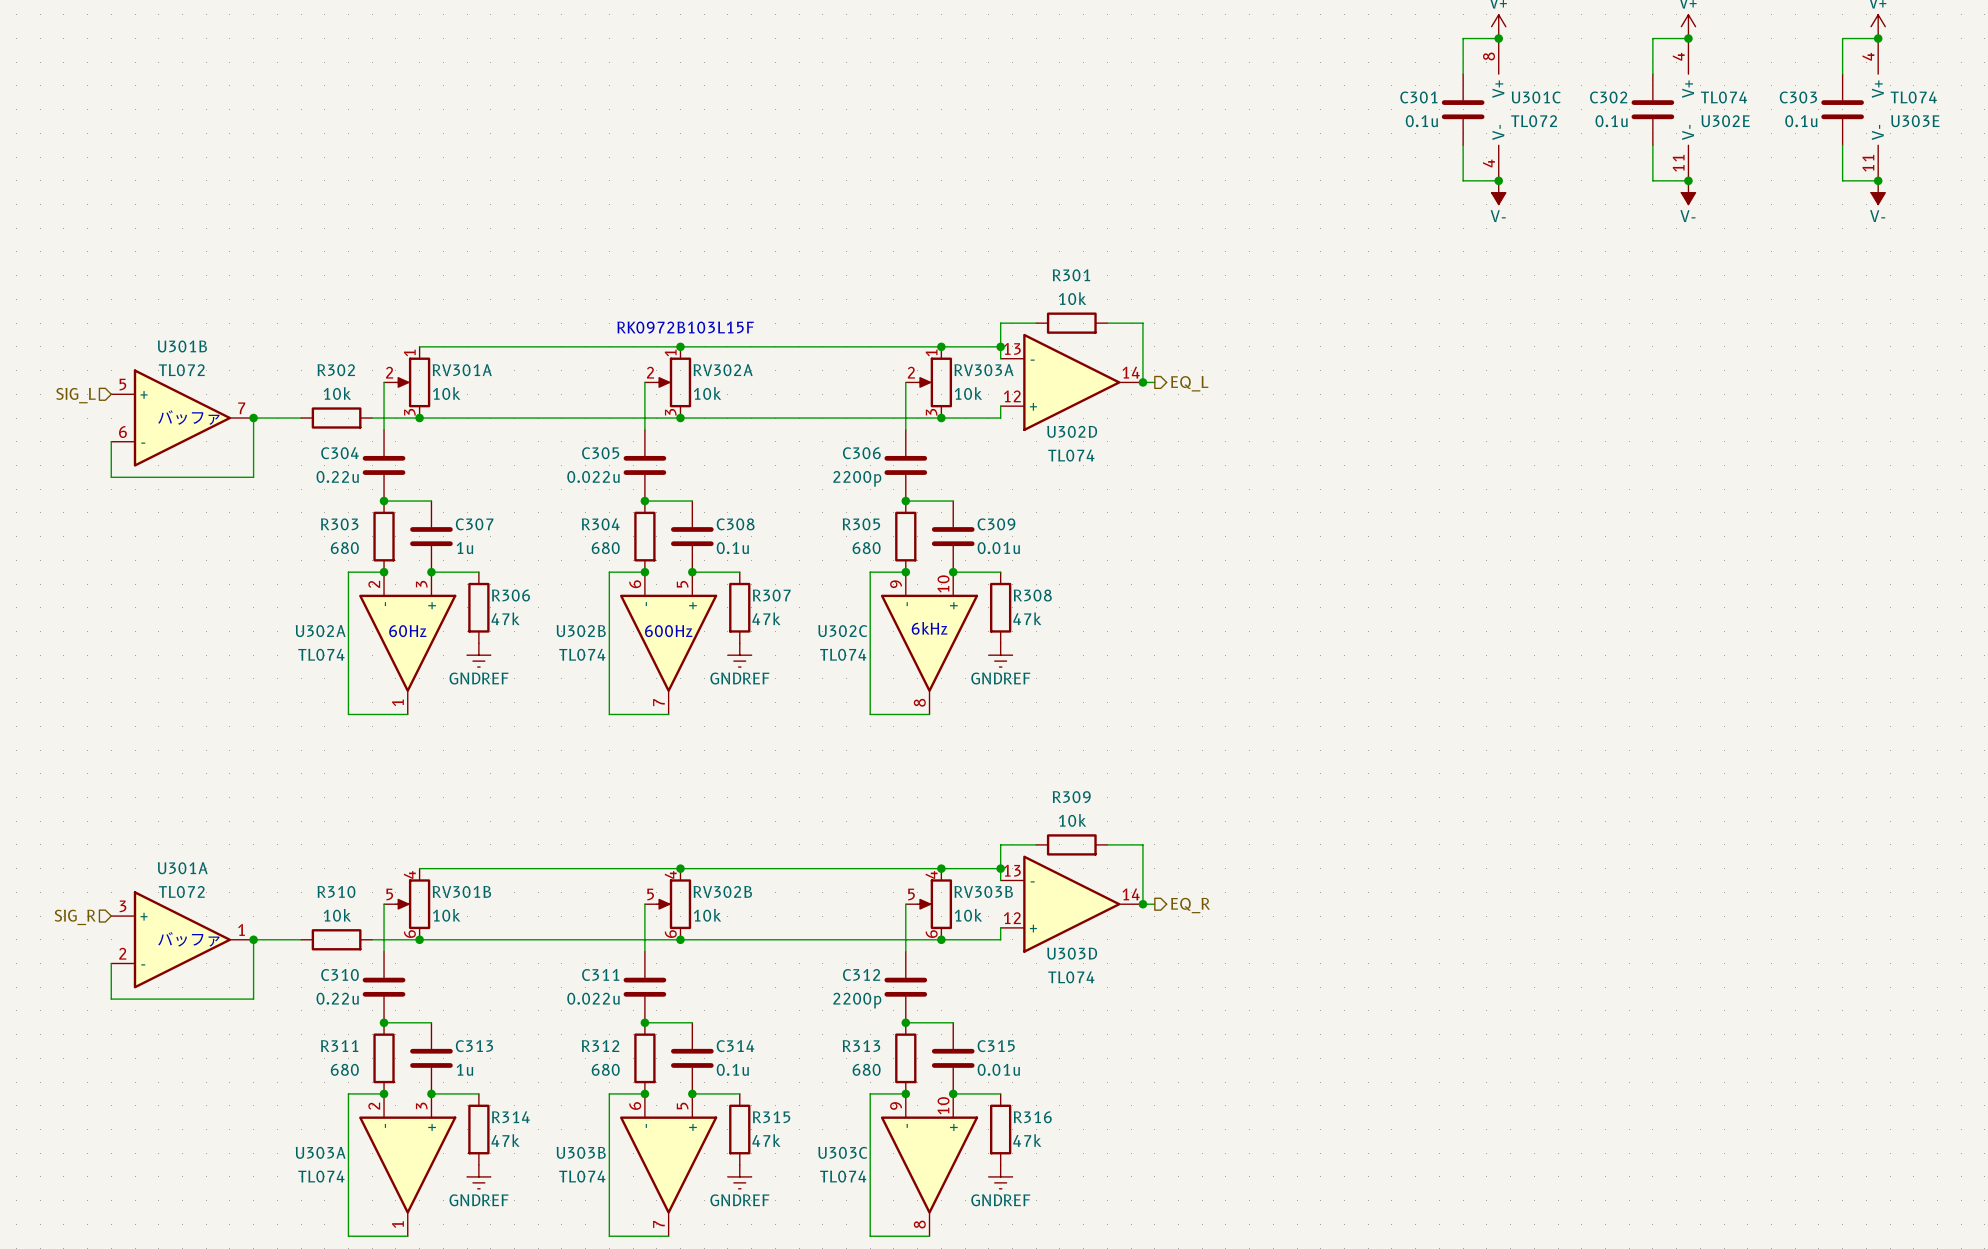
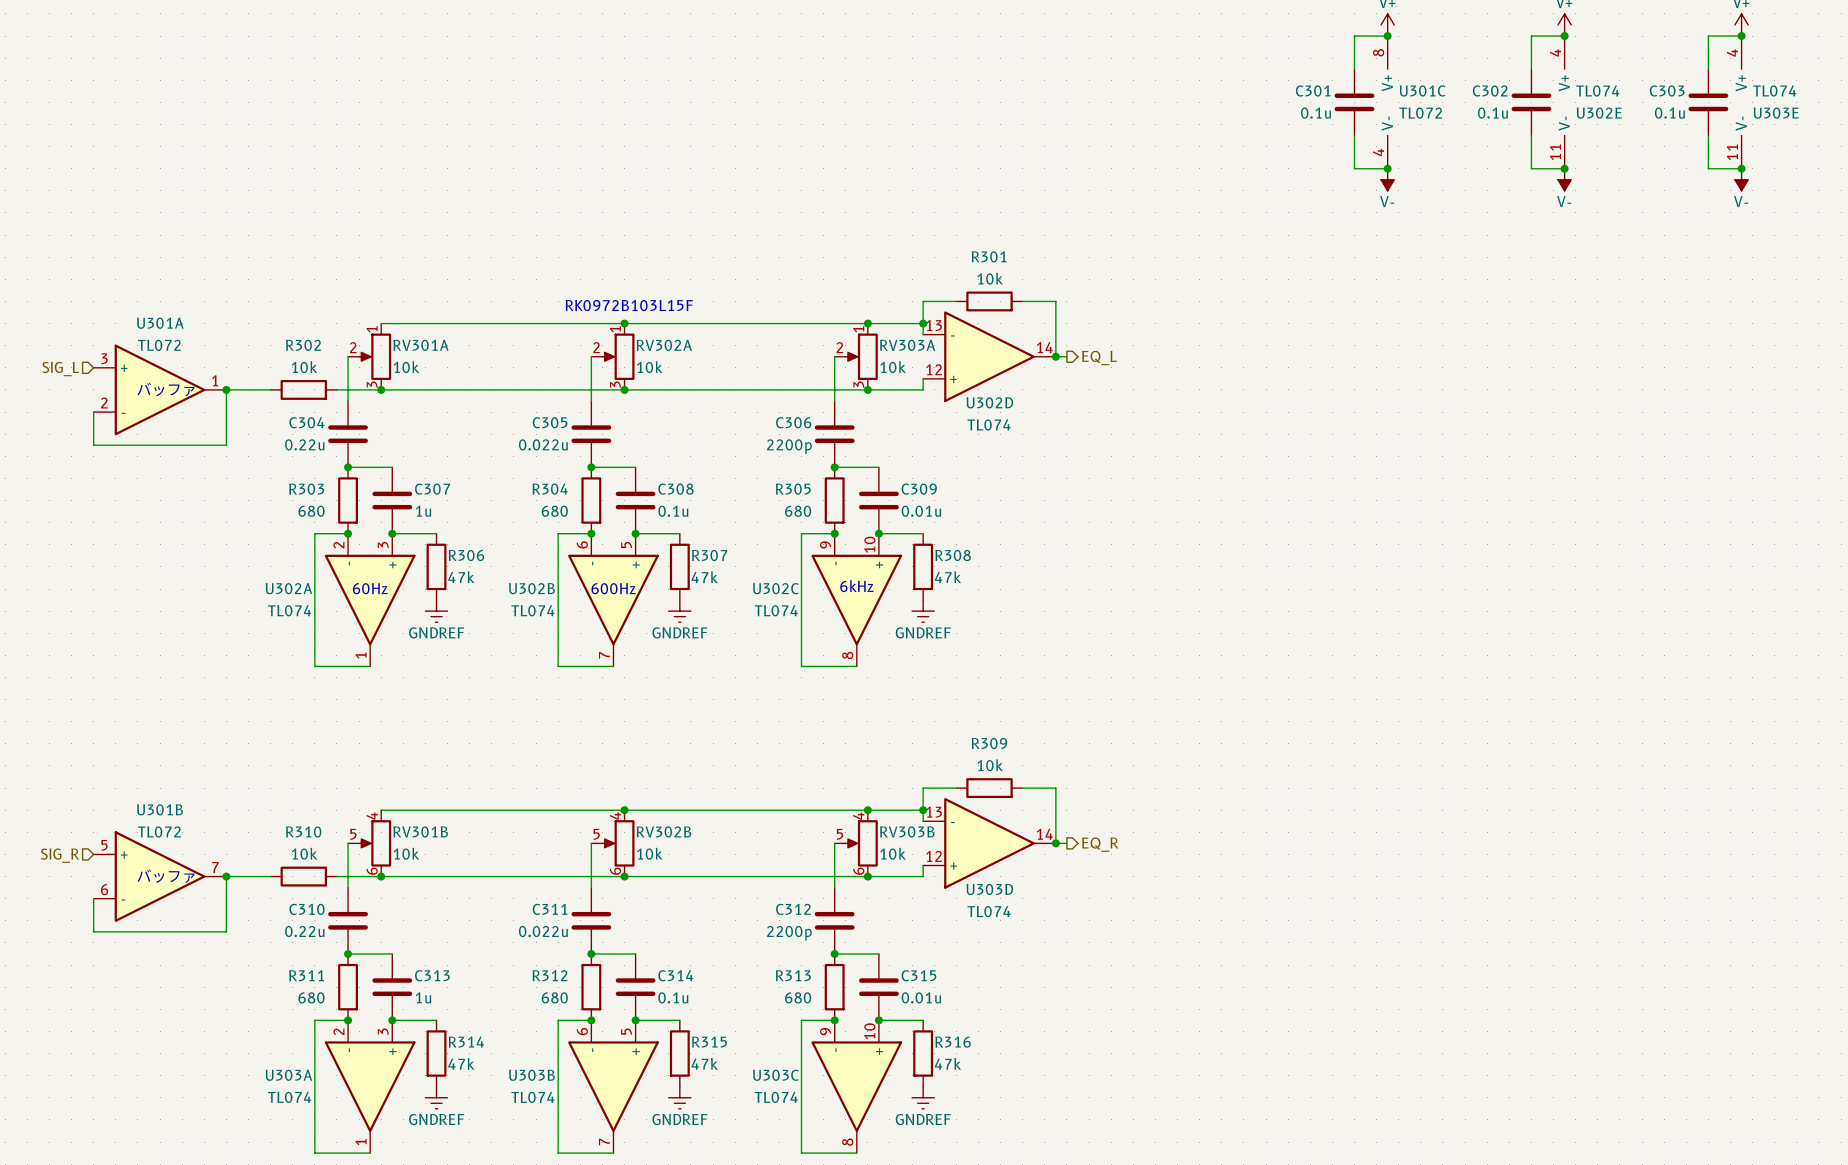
U301B position: (182, 418) -> (160, 876)
U301A position: (182, 939) -> (160, 389)

